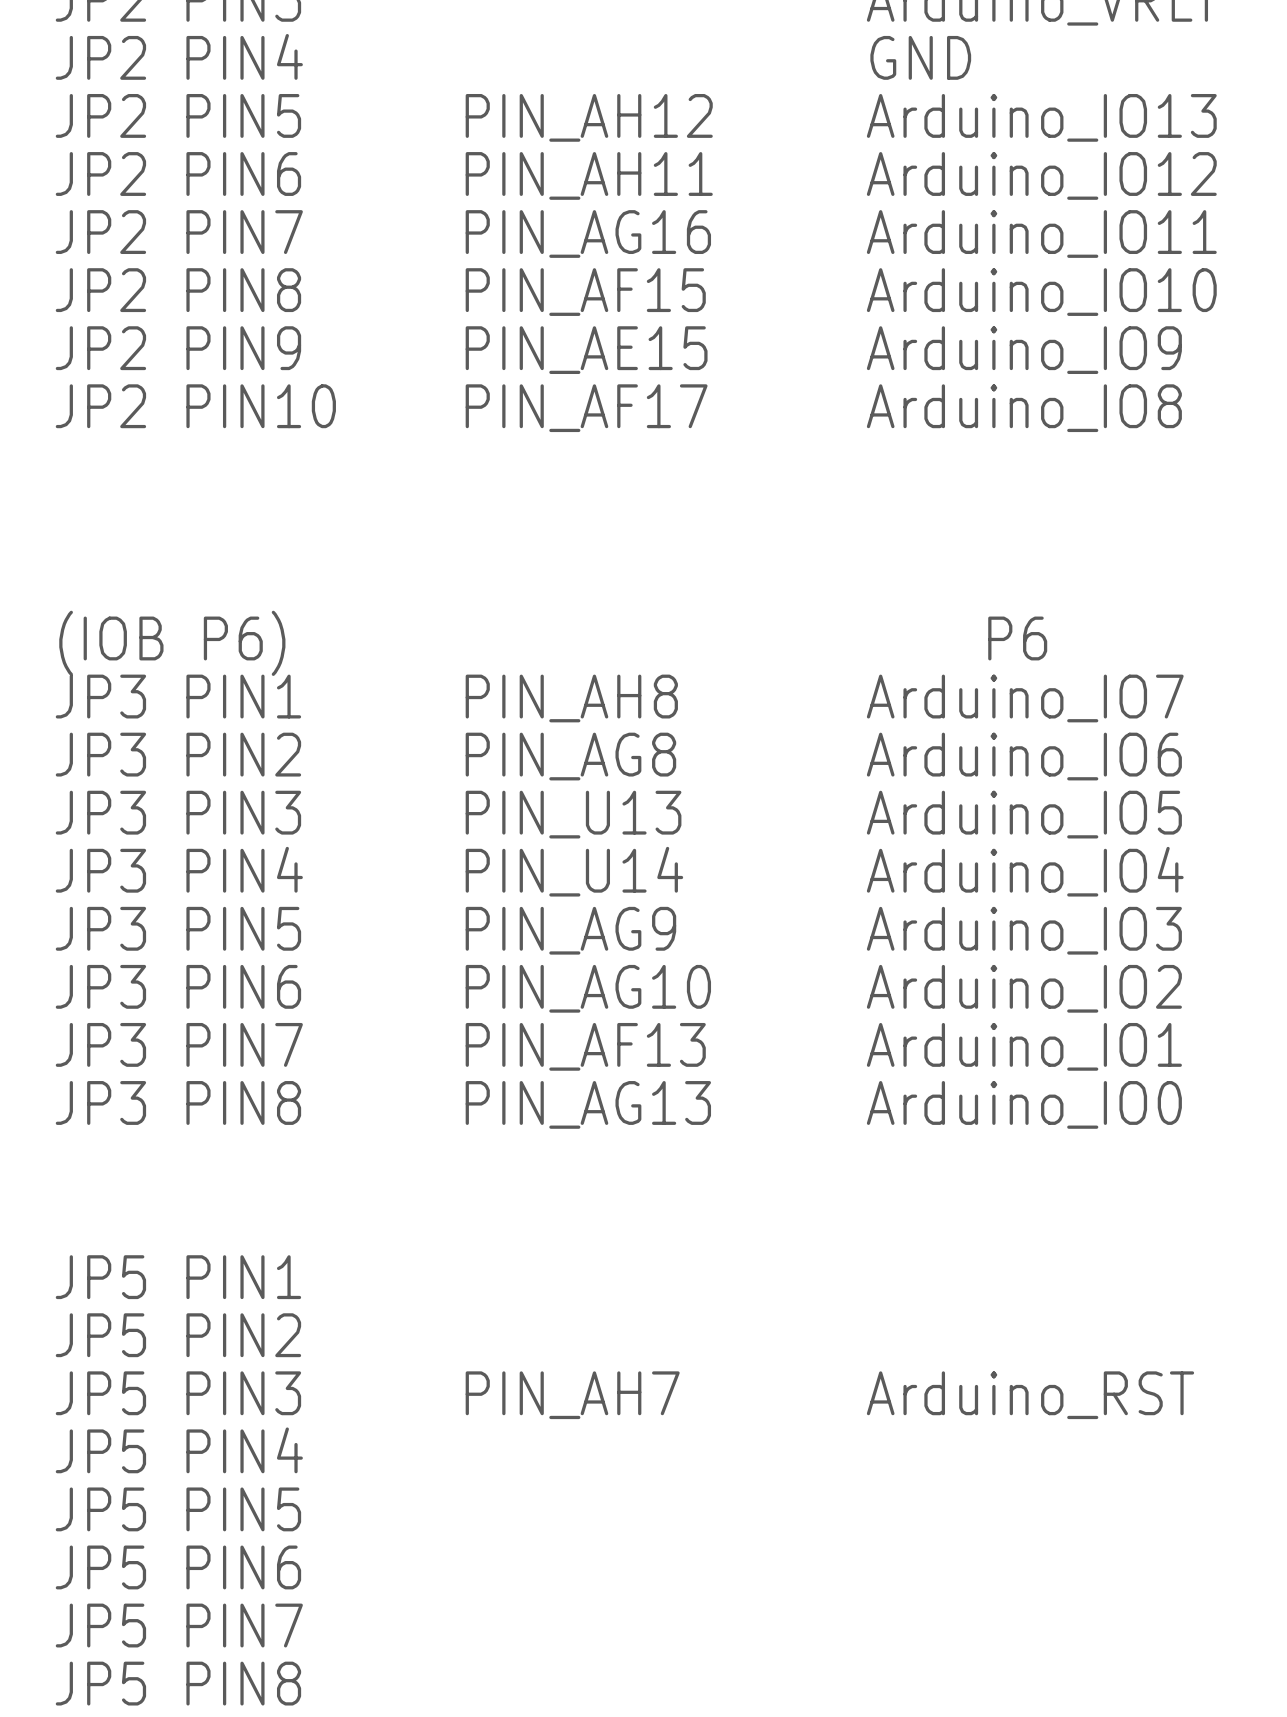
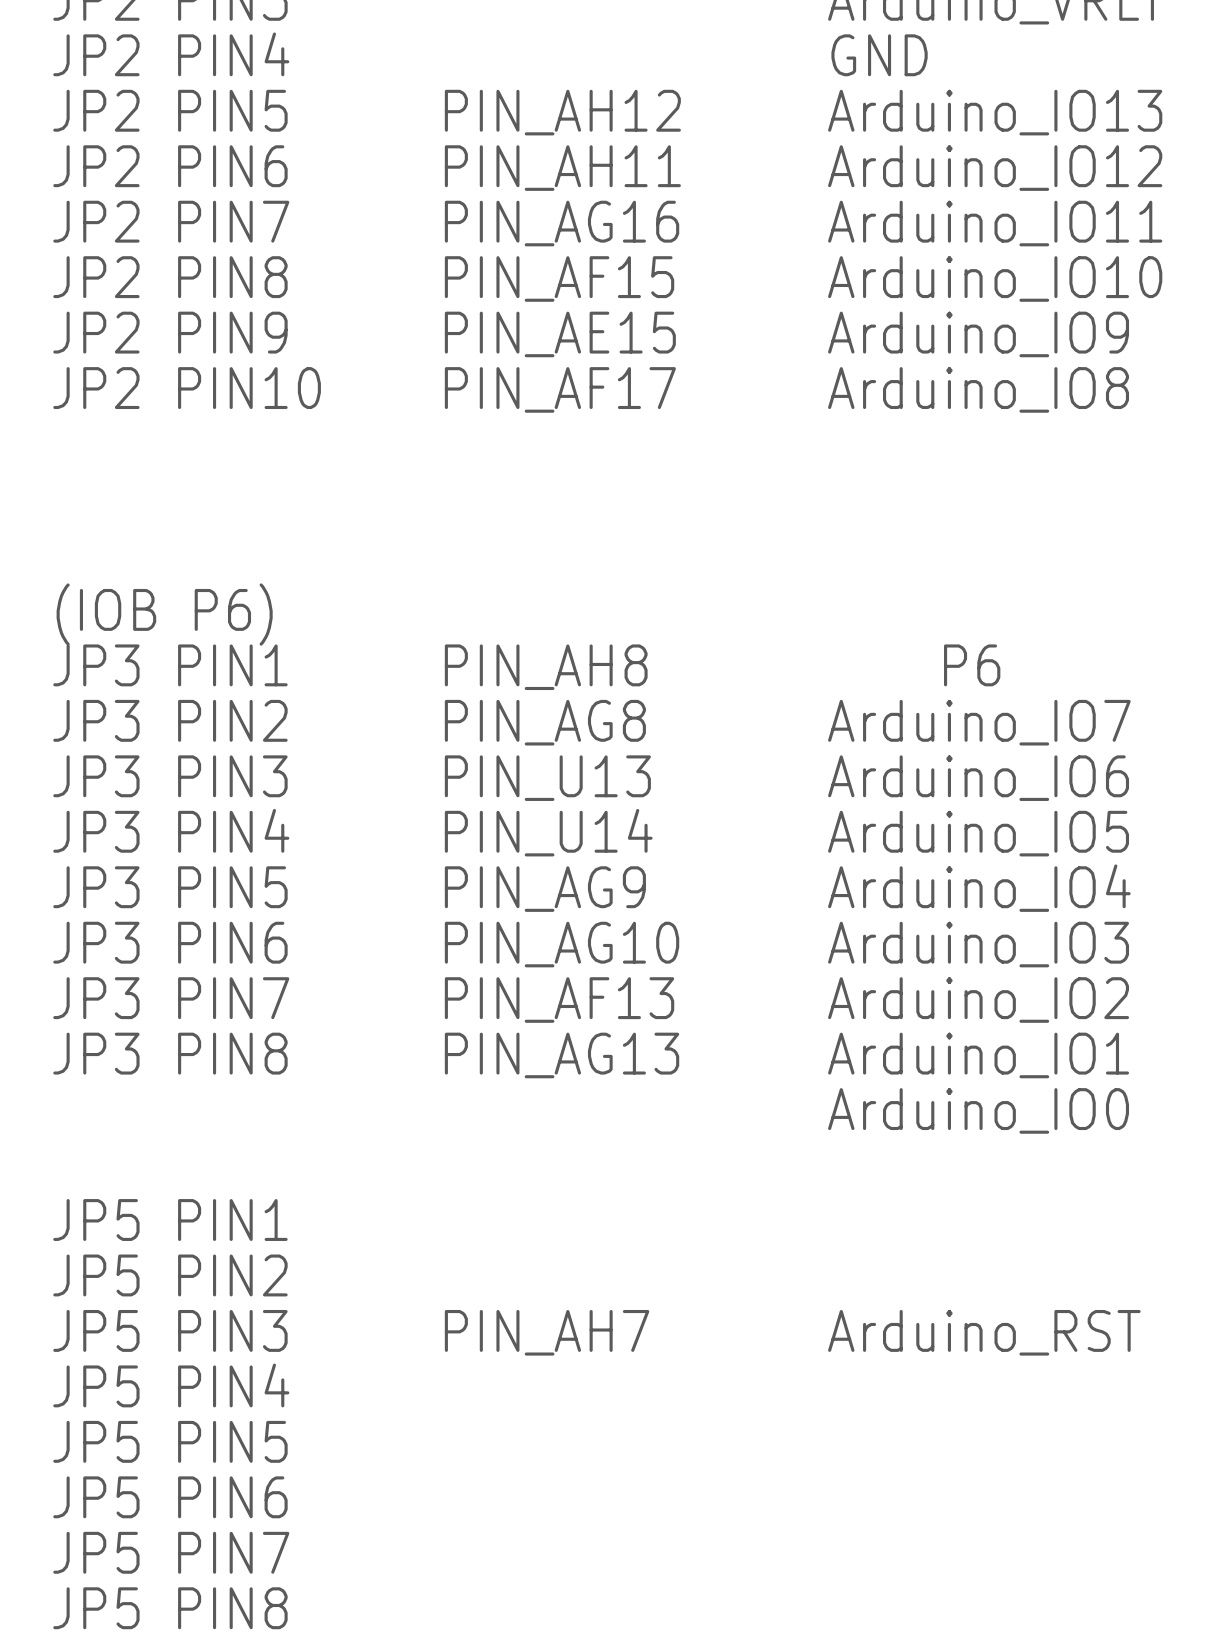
text position: P6 (1017, 638) -> P6 (972, 665)
text: Arduino_IO7 (1025, 698) -> none
text: Arduino_IO6 (1024, 756) -> Arduino_IO7 (979, 722)
text: Arduino_IO5 (1024, 814) -> Arduino_IO6 (978, 778)
text: Arduino_IO4 (1025, 871) -> Arduino_IO5 (978, 833)
text: Arduino_IO3 (1024, 930) -> Arduino_IO4 (979, 888)
text: Arduino_IO2 (1024, 988) -> Arduino_IO3 (978, 944)
text: Arduino_IO1 (1024, 1046) -> Arduino_IO2 (978, 1000)
text: Arduino_IO0 (1024, 1104) -> Arduino_IO1 (978, 1055)
text: none -> Arduino_IO0 (978, 1110)

